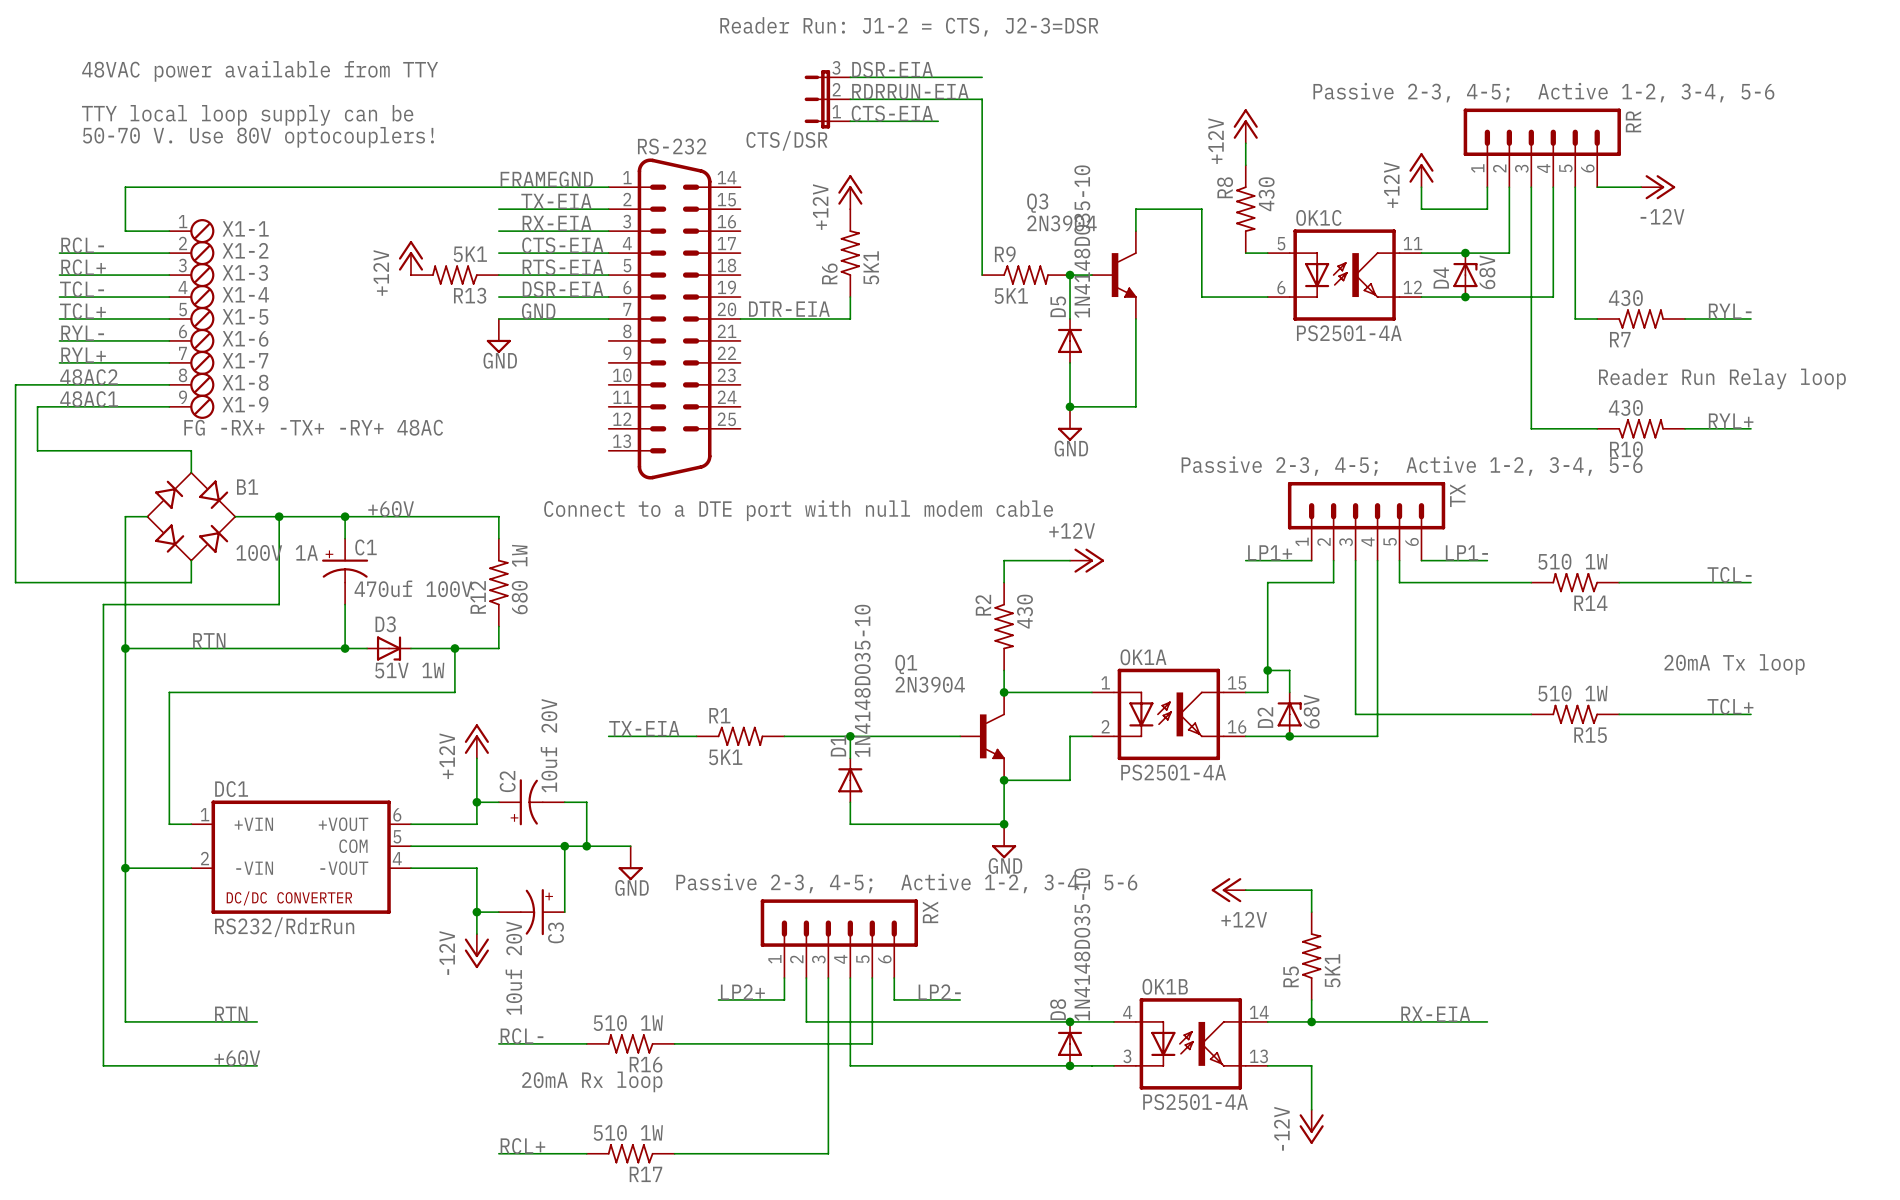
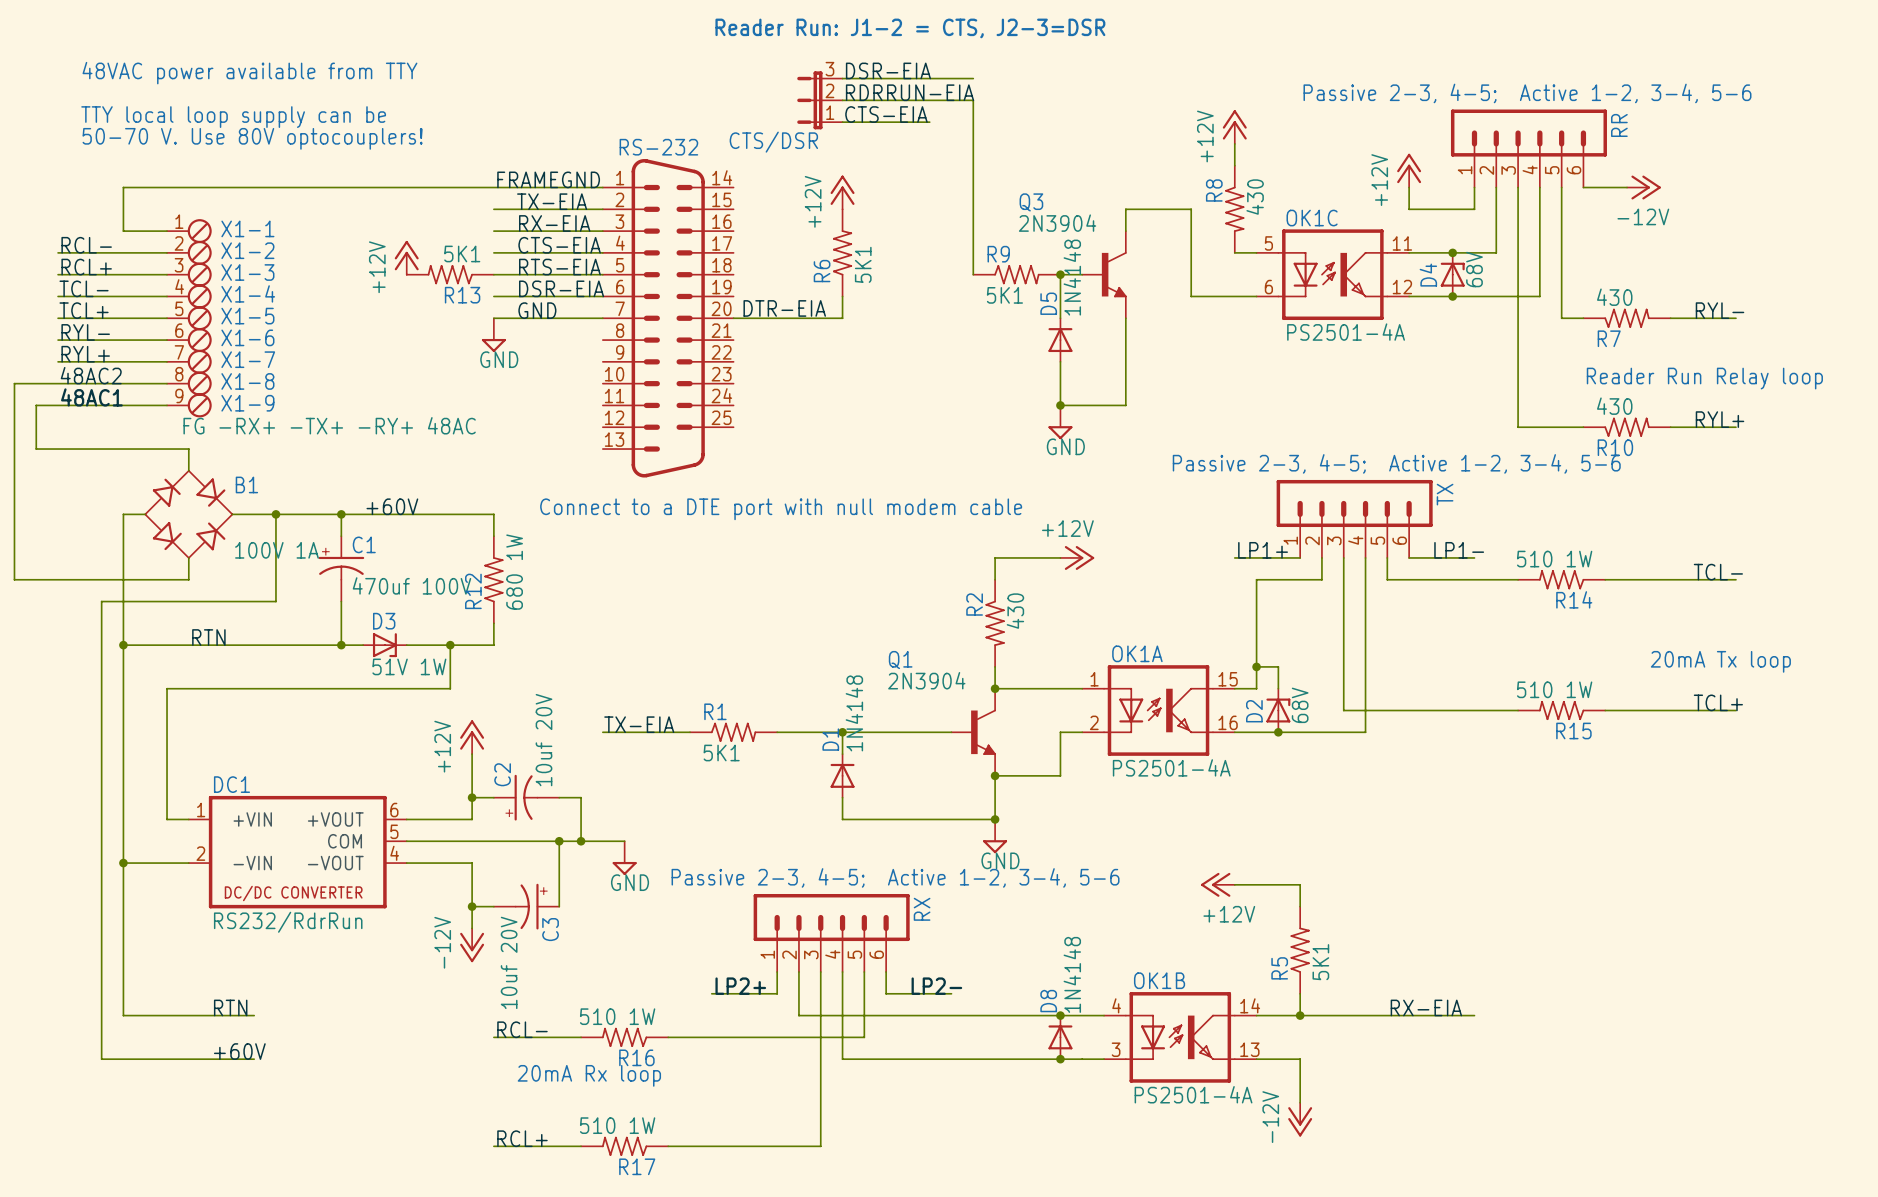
D5 value: 1N4148DO35-10 (1082, 241) -> 1N4148 (1072, 277)
D1 value: 1N4148DO35-10 (862, 681) -> 1N4148 (854, 713)
D8 value: 1N4148DO35-10 (1082, 944) -> 1N4148 (1072, 974)

